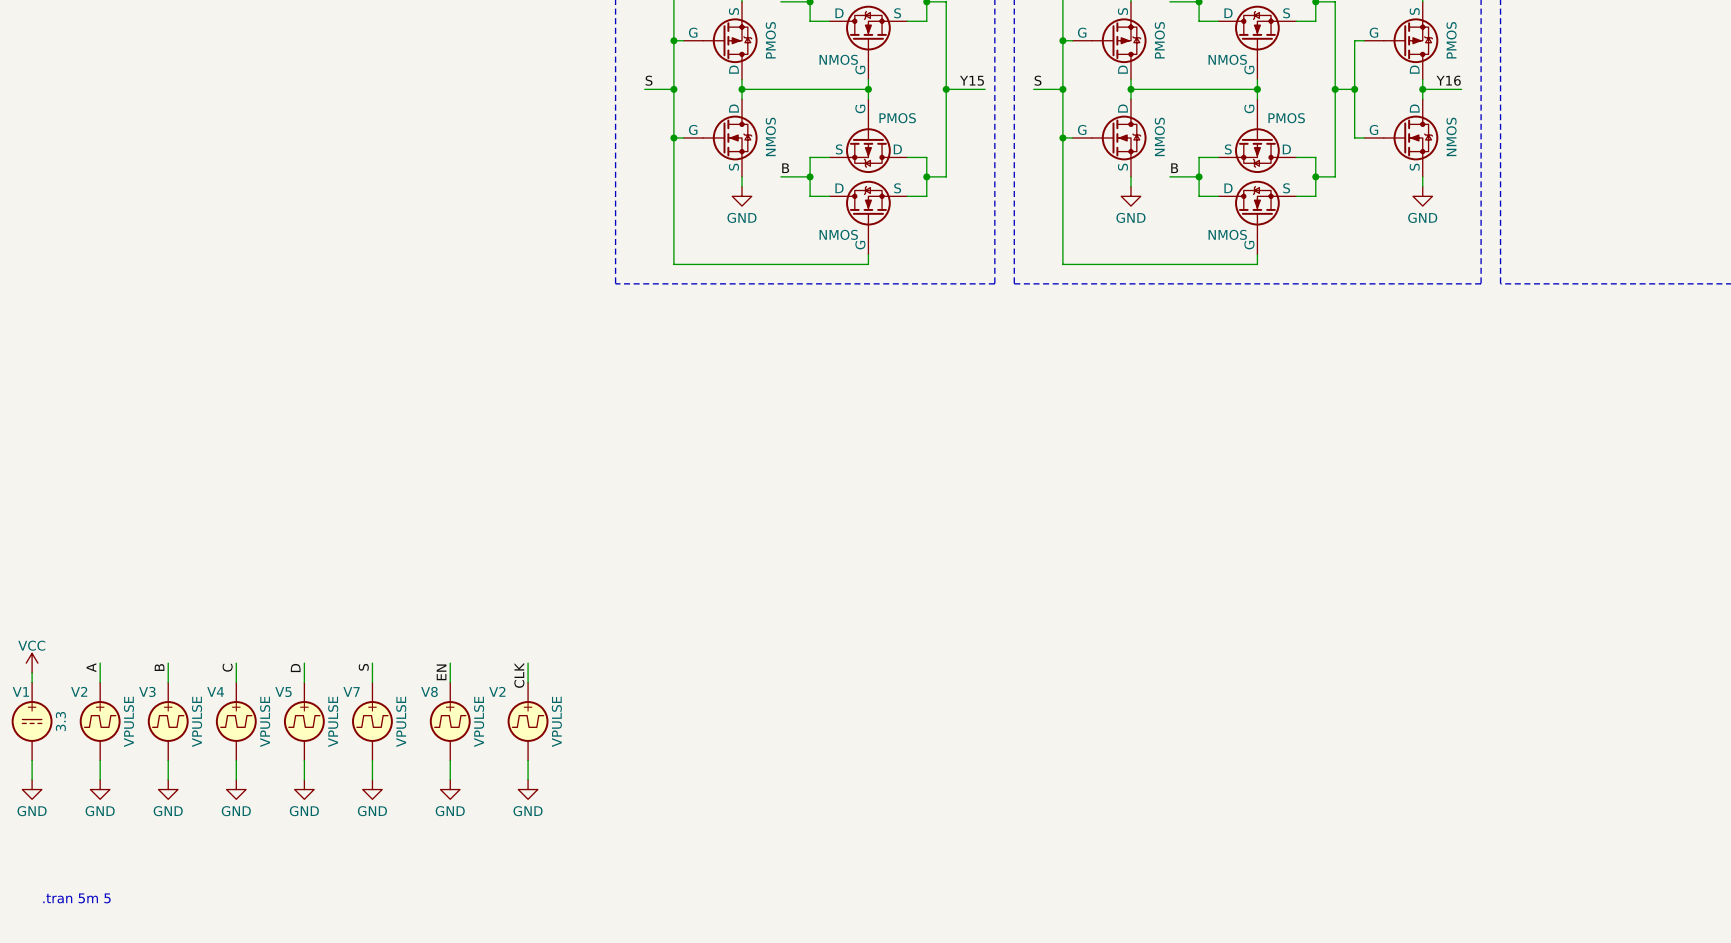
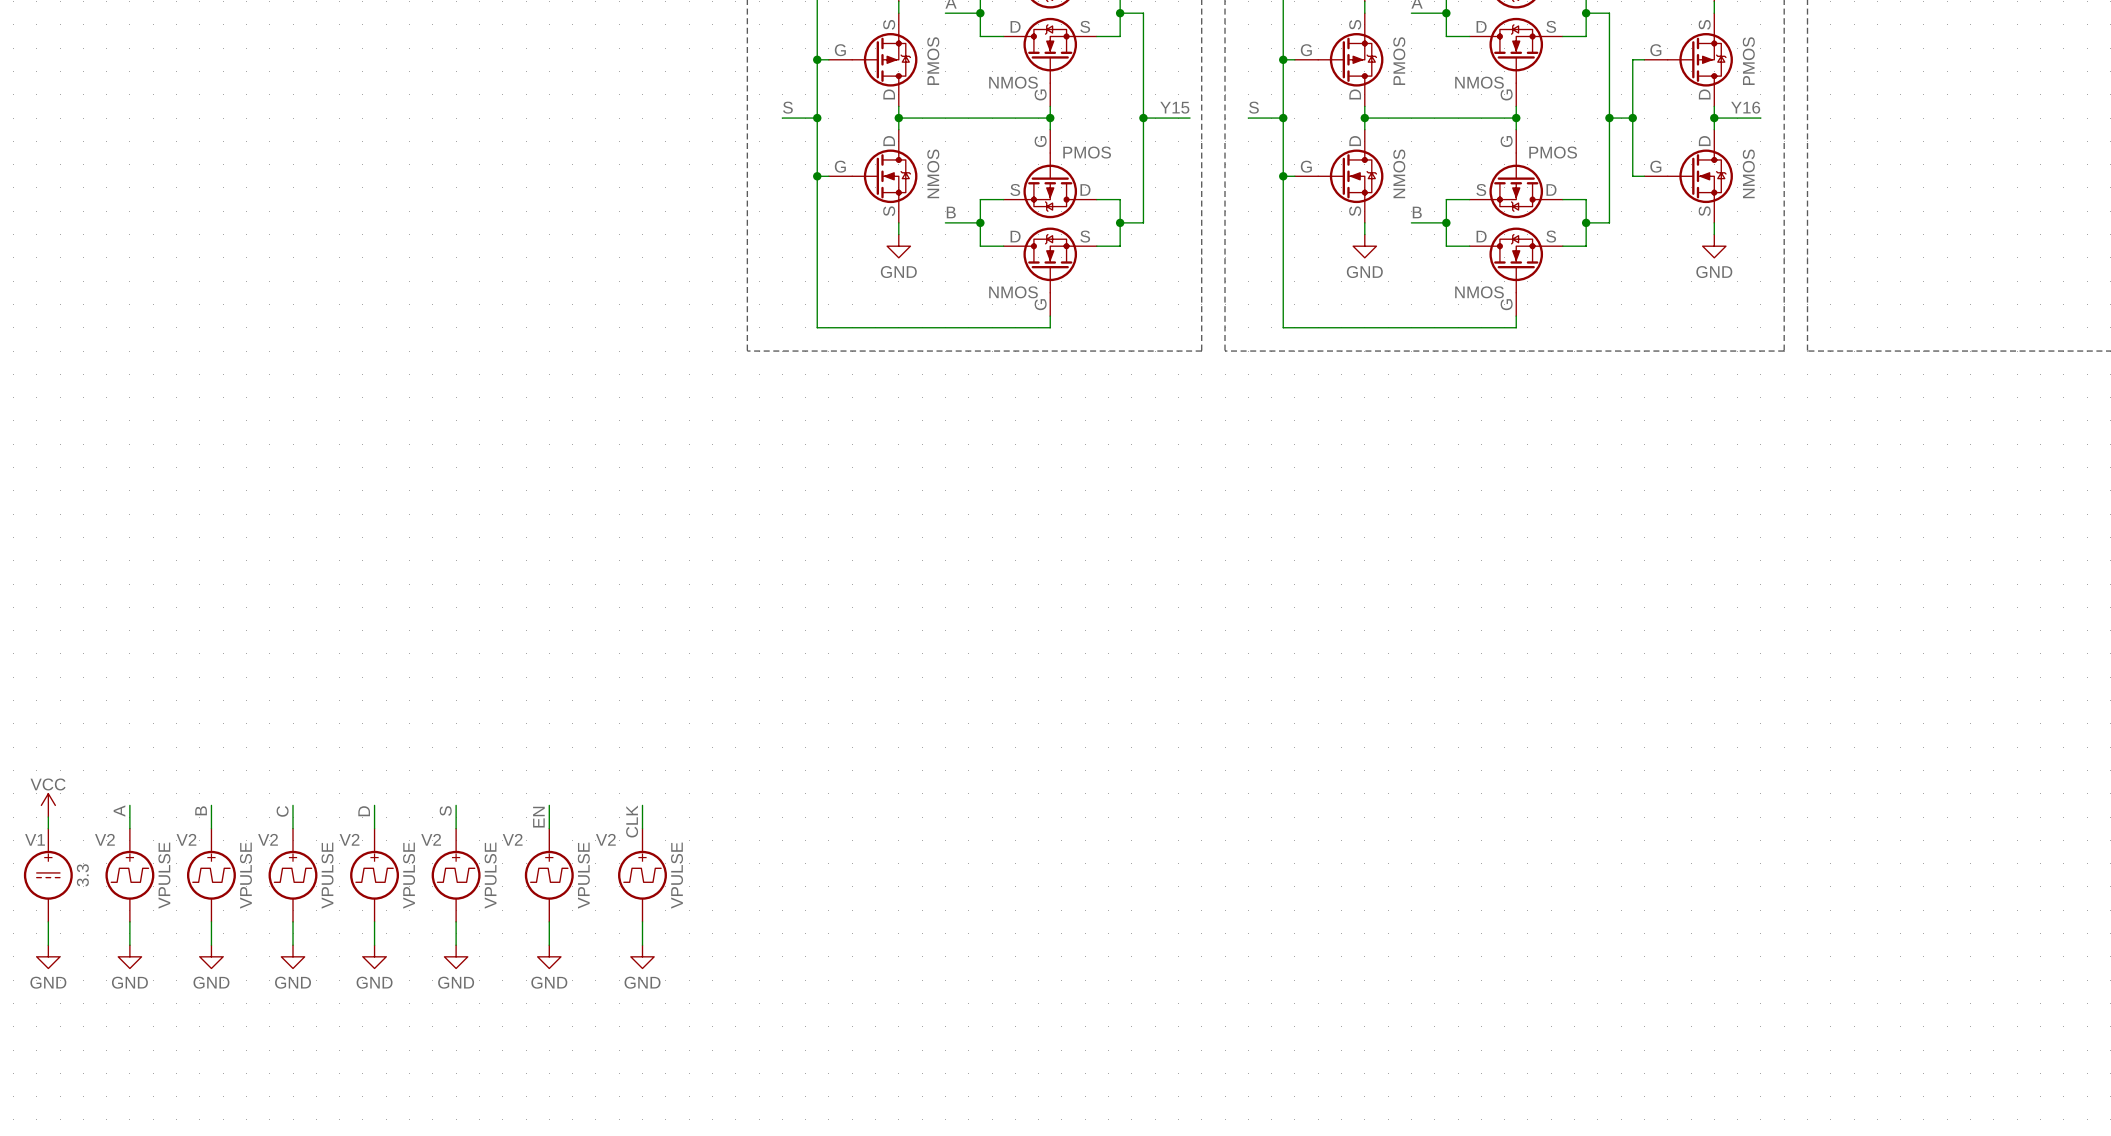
V3 name: V3 (147, 691) -> V2 (186, 839)
V4 name: V4 (215, 691) -> V2 (268, 839)
V7 name: V7 (351, 691) -> V2 (431, 839)
V8 name: V8 (429, 691) -> V2 (512, 839)
V5 name: V5 (283, 692) -> V2 (349, 839)
text: .tran 5m 5 (76, 898) -> none

